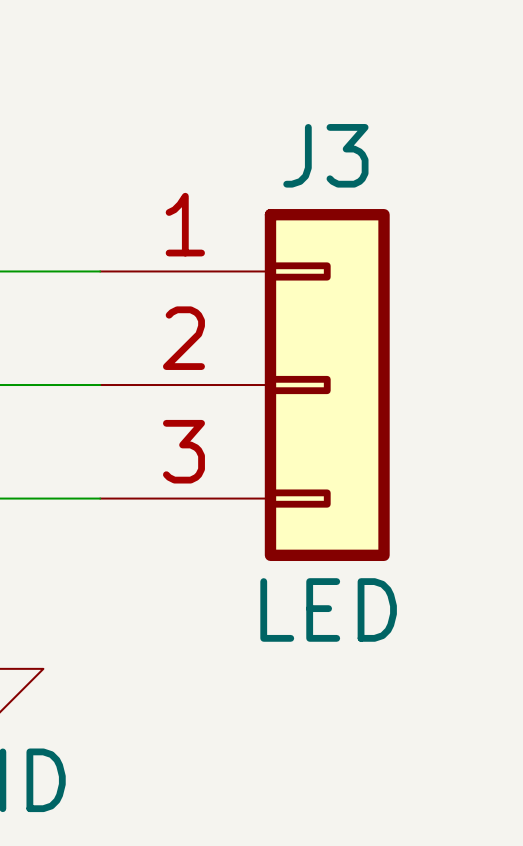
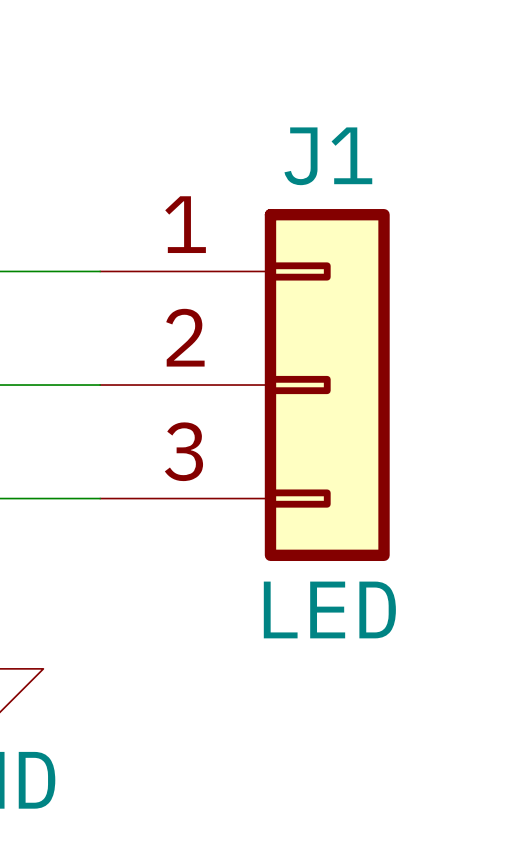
J3 name: J3 (325, 155) -> J1 (328, 156)

